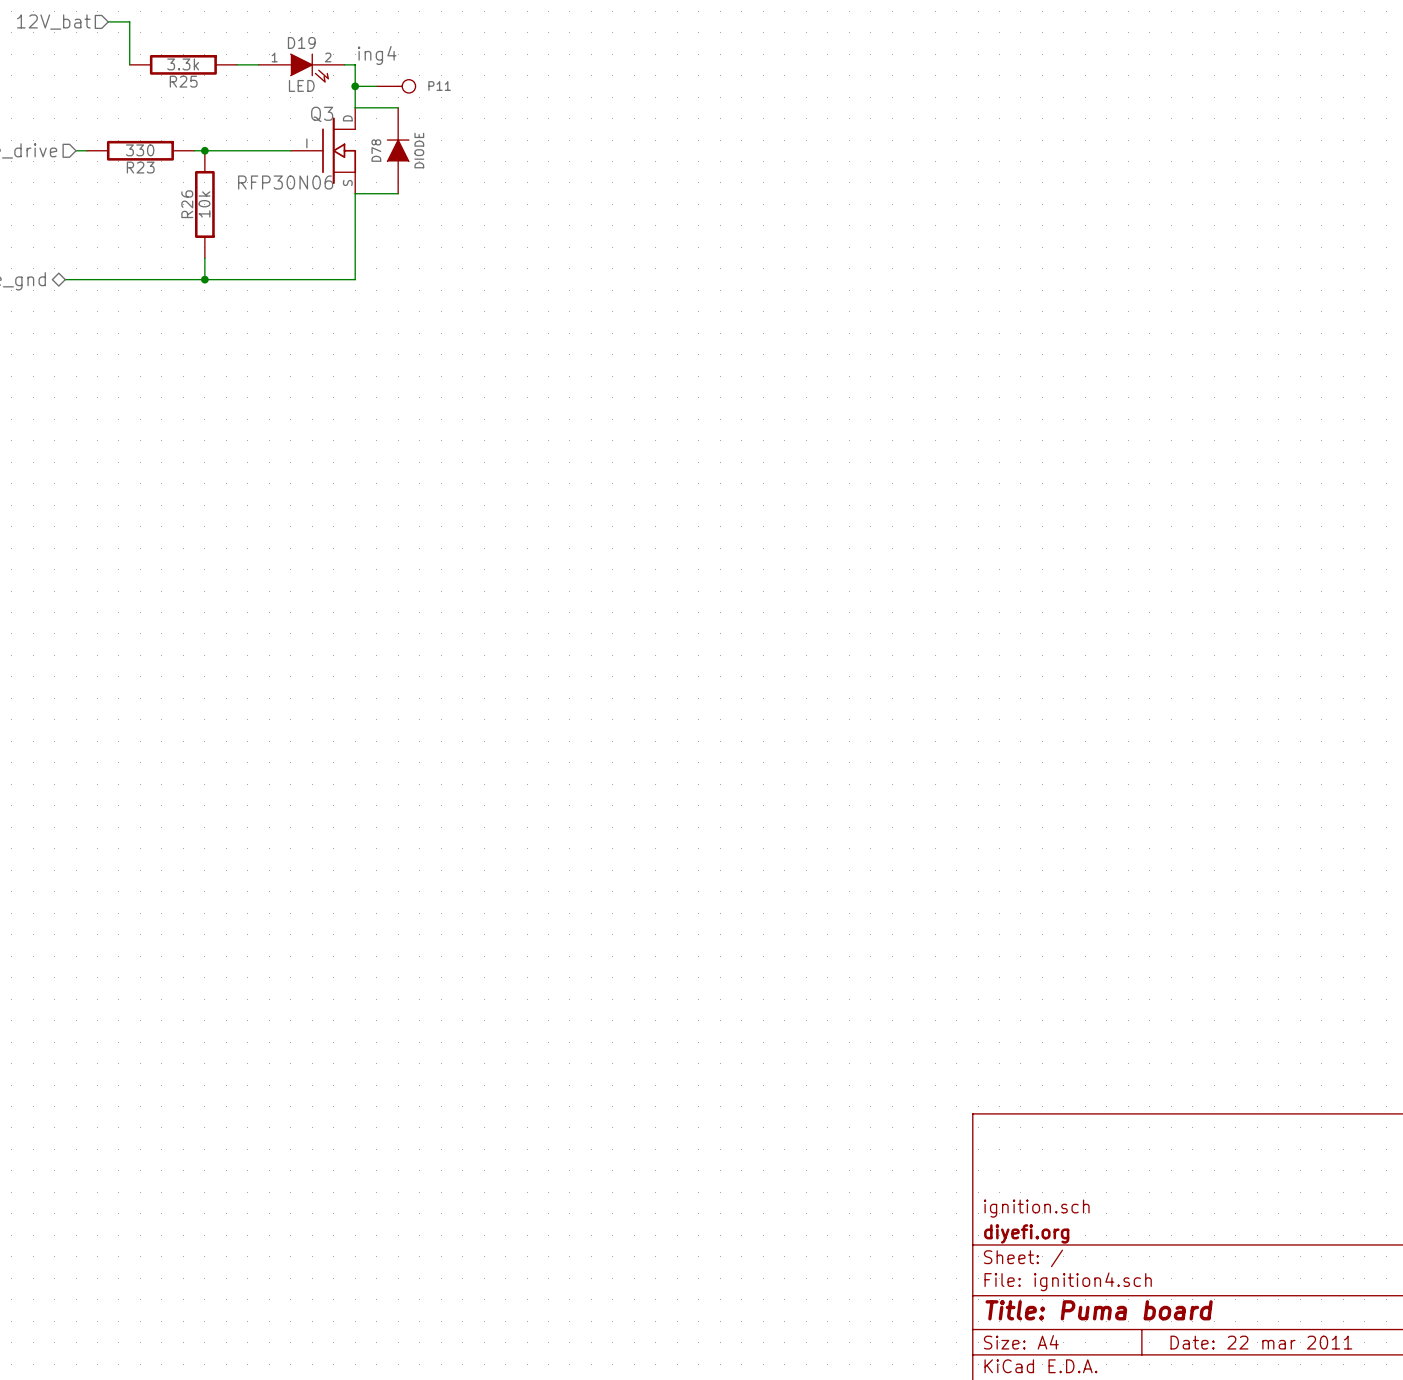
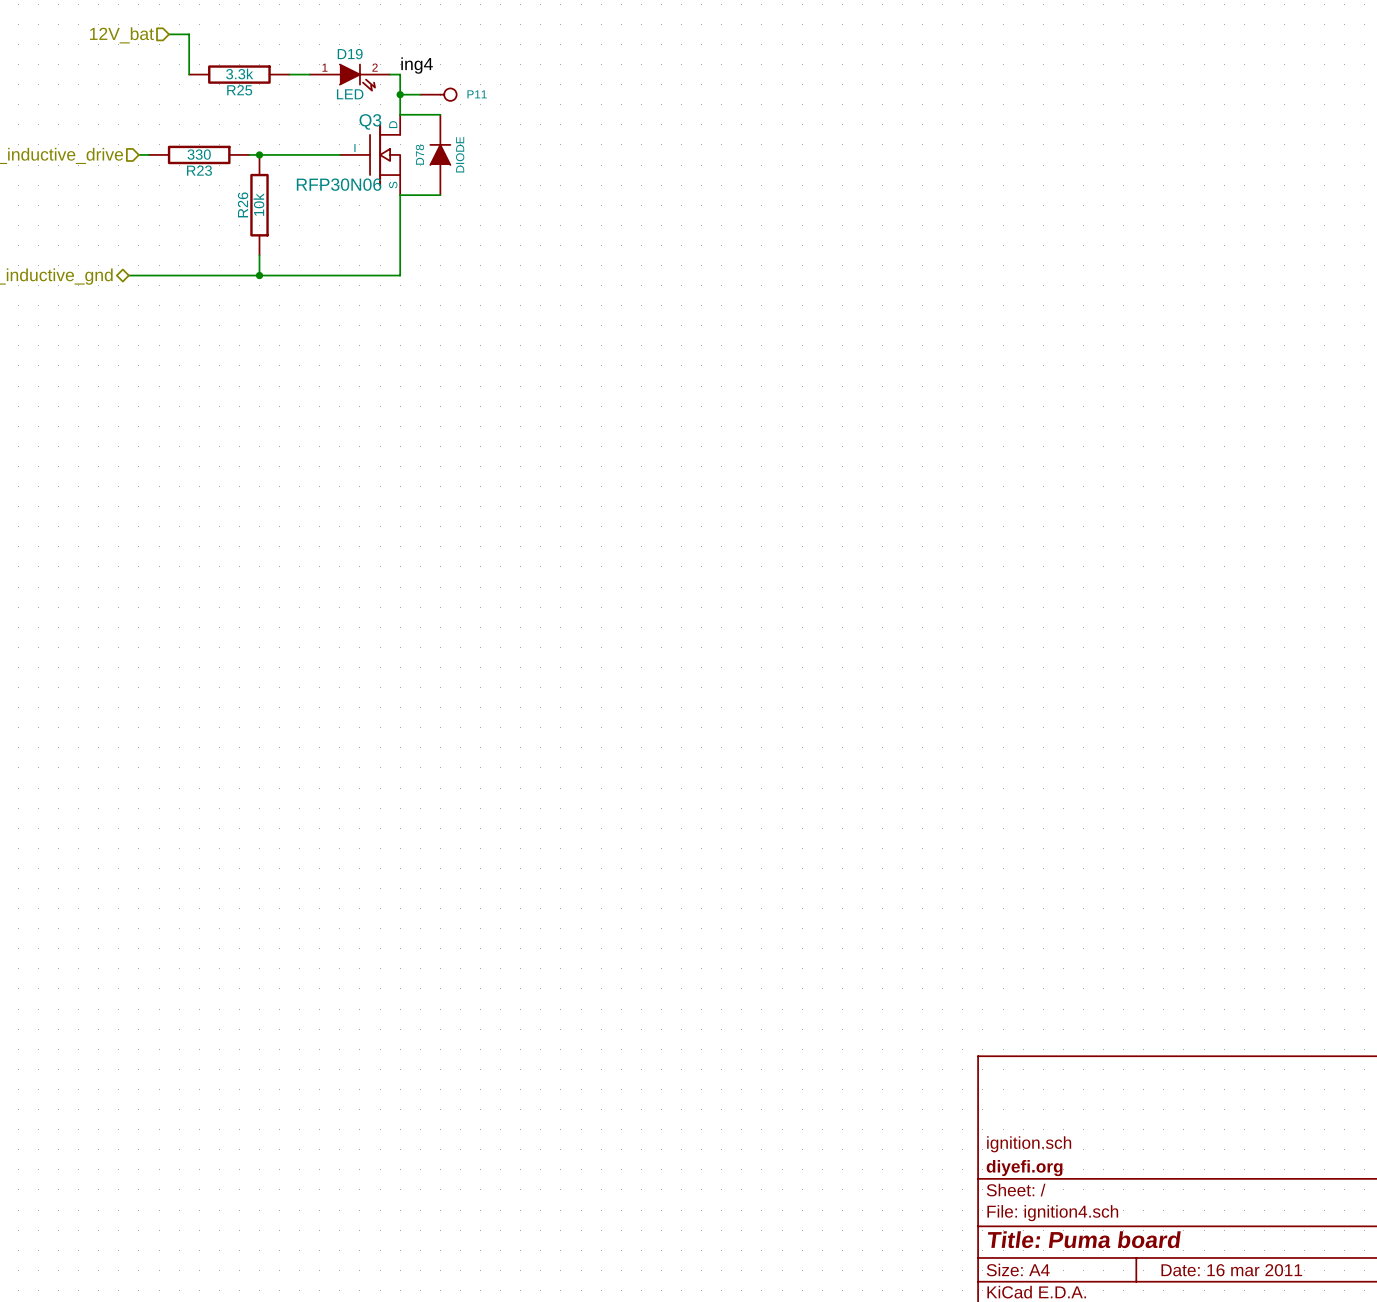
title block: Date: 22 mar 2011 (1261, 1342) -> Date: 16 mar 2011 (1231, 1270)

